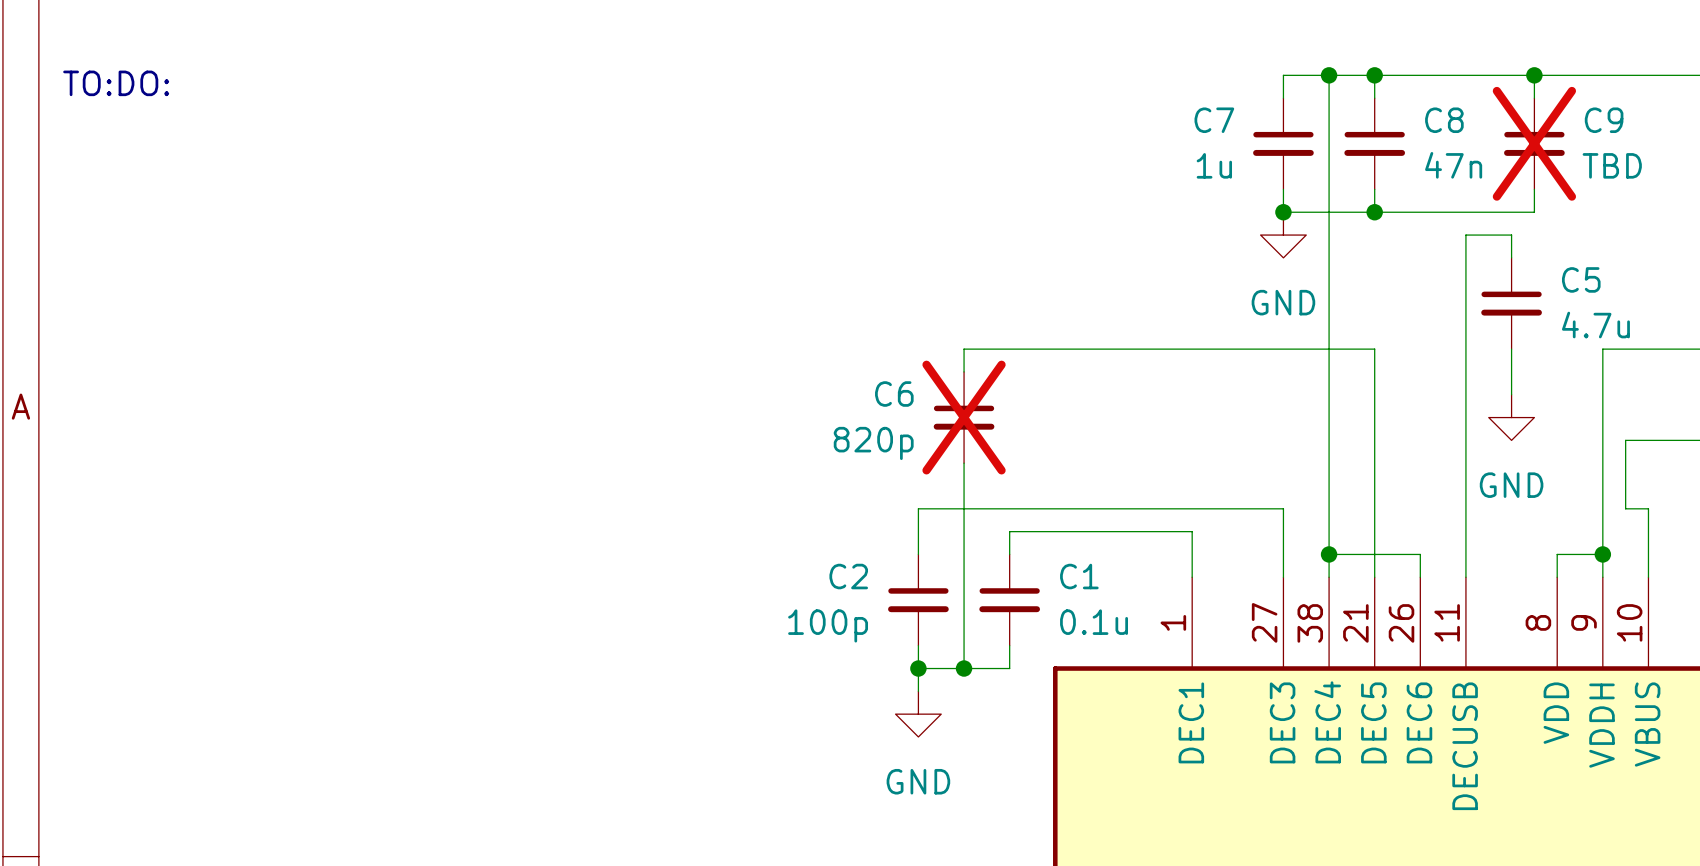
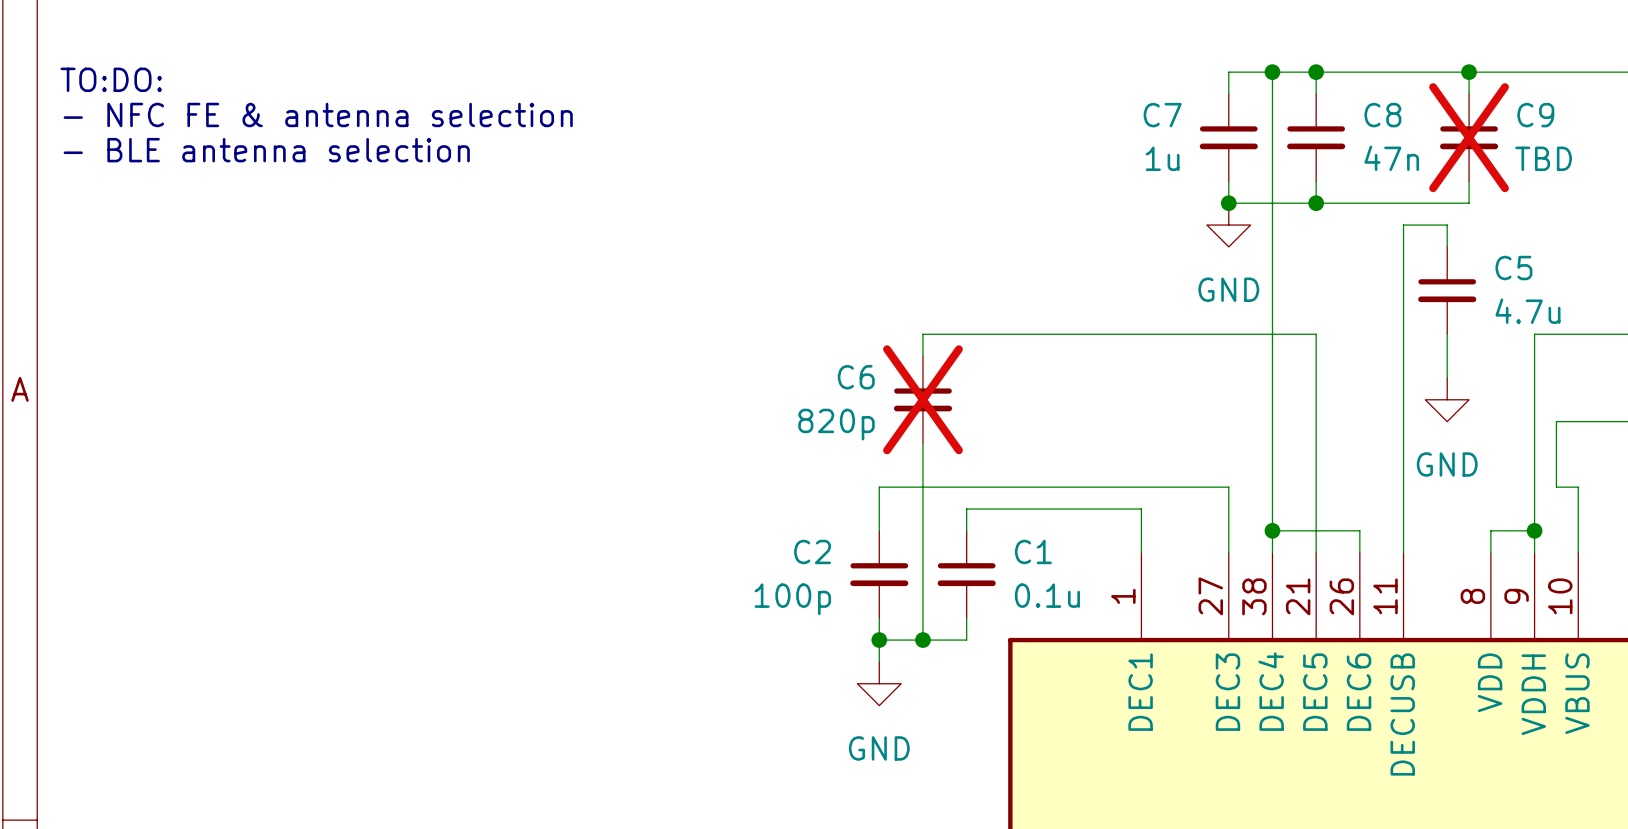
text: none -> - NFC FE & antenna selection (318, 114)
text: none -> - BLE antenna selection (266, 150)

